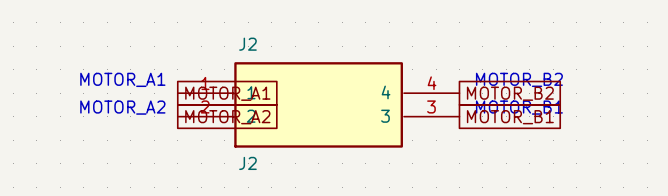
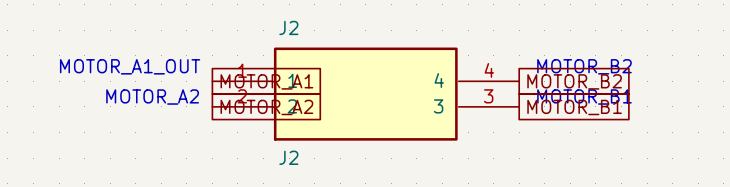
text: MOTOR_A1 (122, 79) -> MOTOR_A1_OUT (130, 66)

